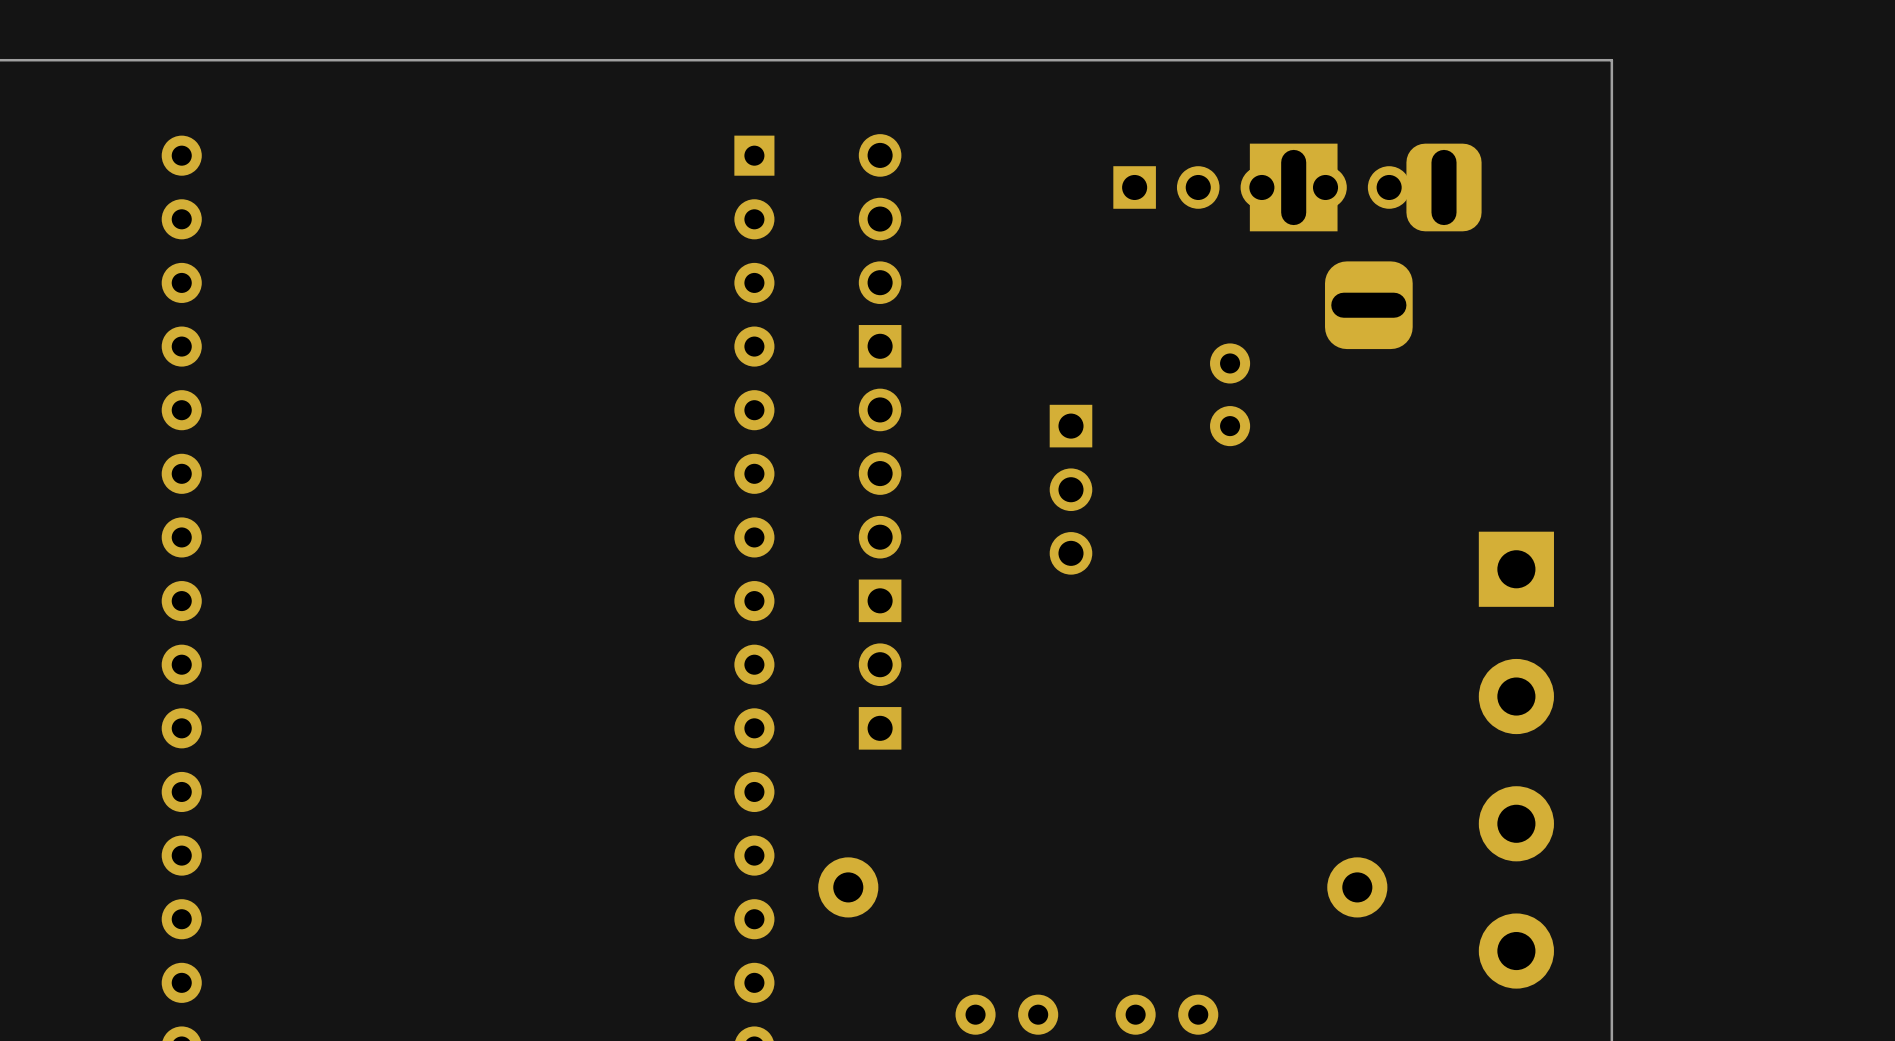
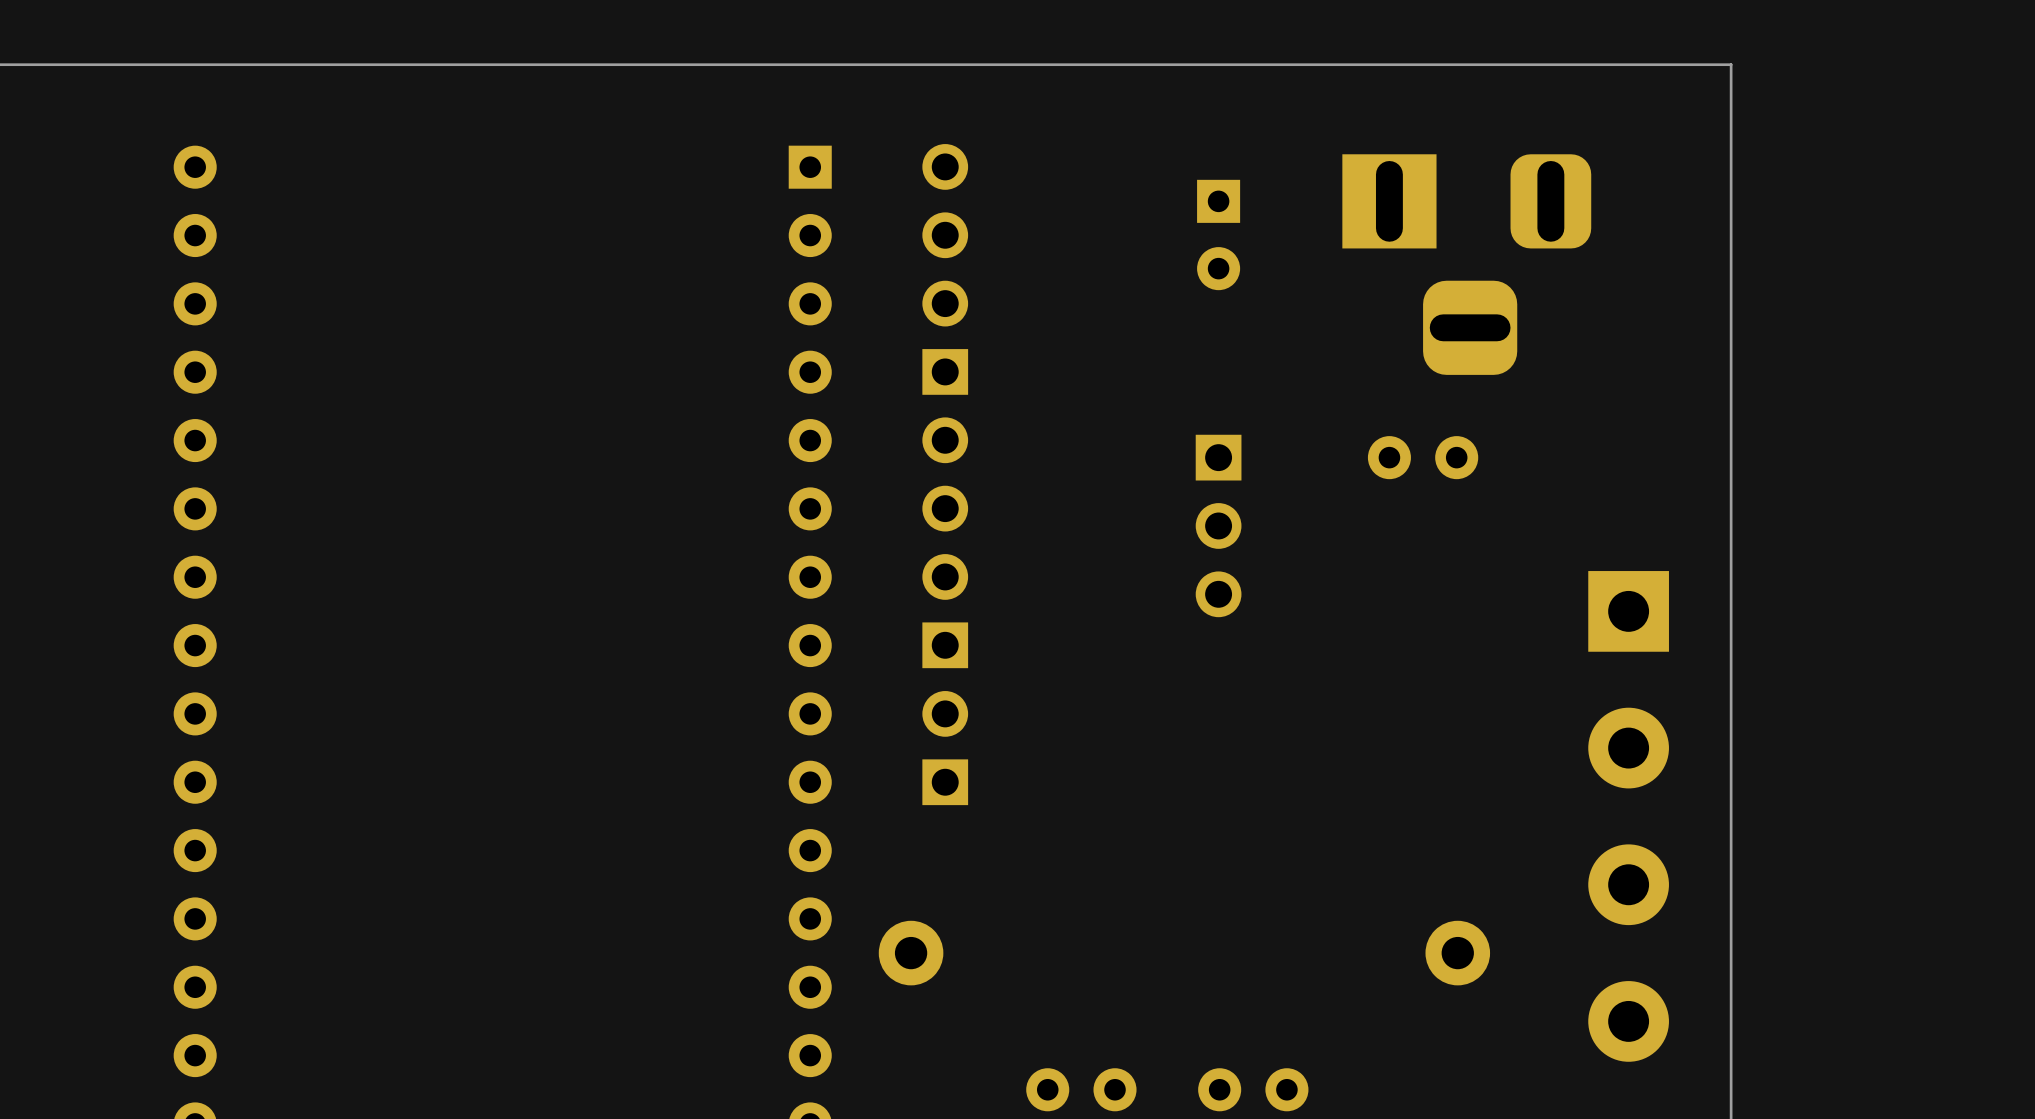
part: (1261, 187) -> none
part: none -> (1218, 234)
part rotation: 0° (1230, 394) -> 90° clockwise (1423, 457)
part position: (1230, 394) -> (1423, 457)
part position: (1070, 489) -> (1218, 525)

